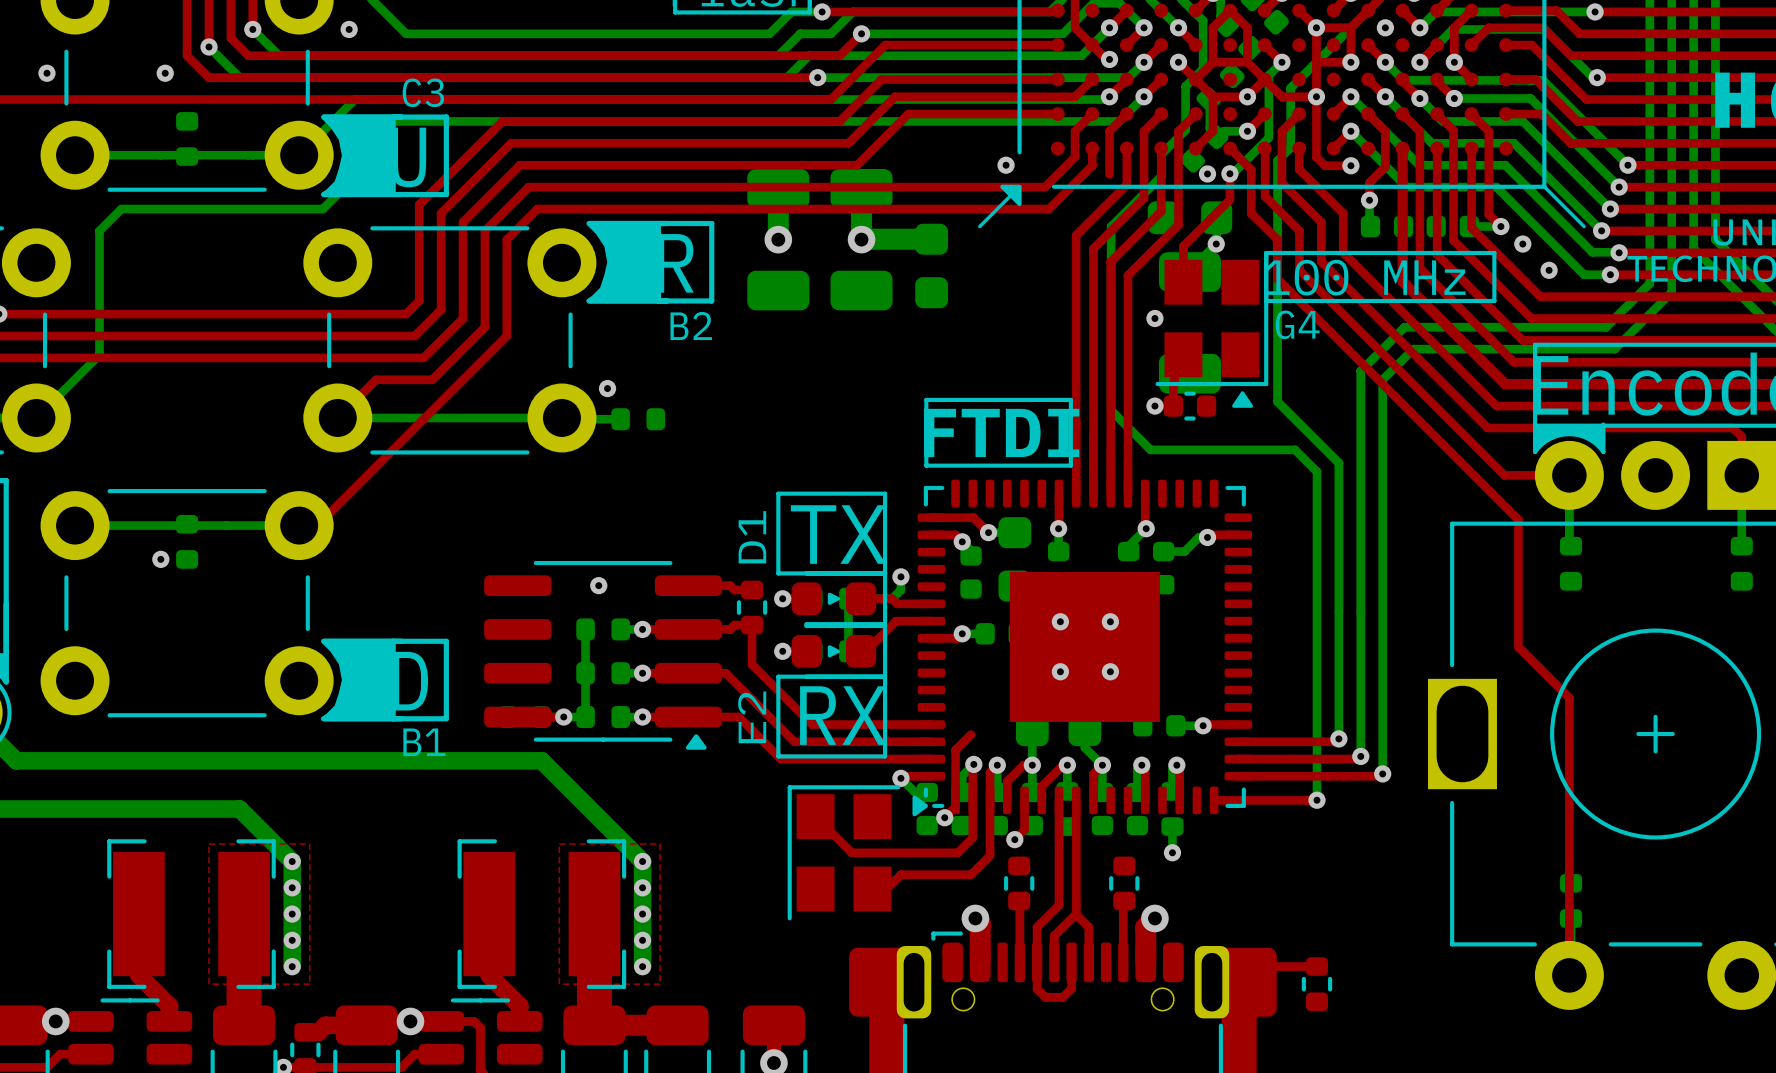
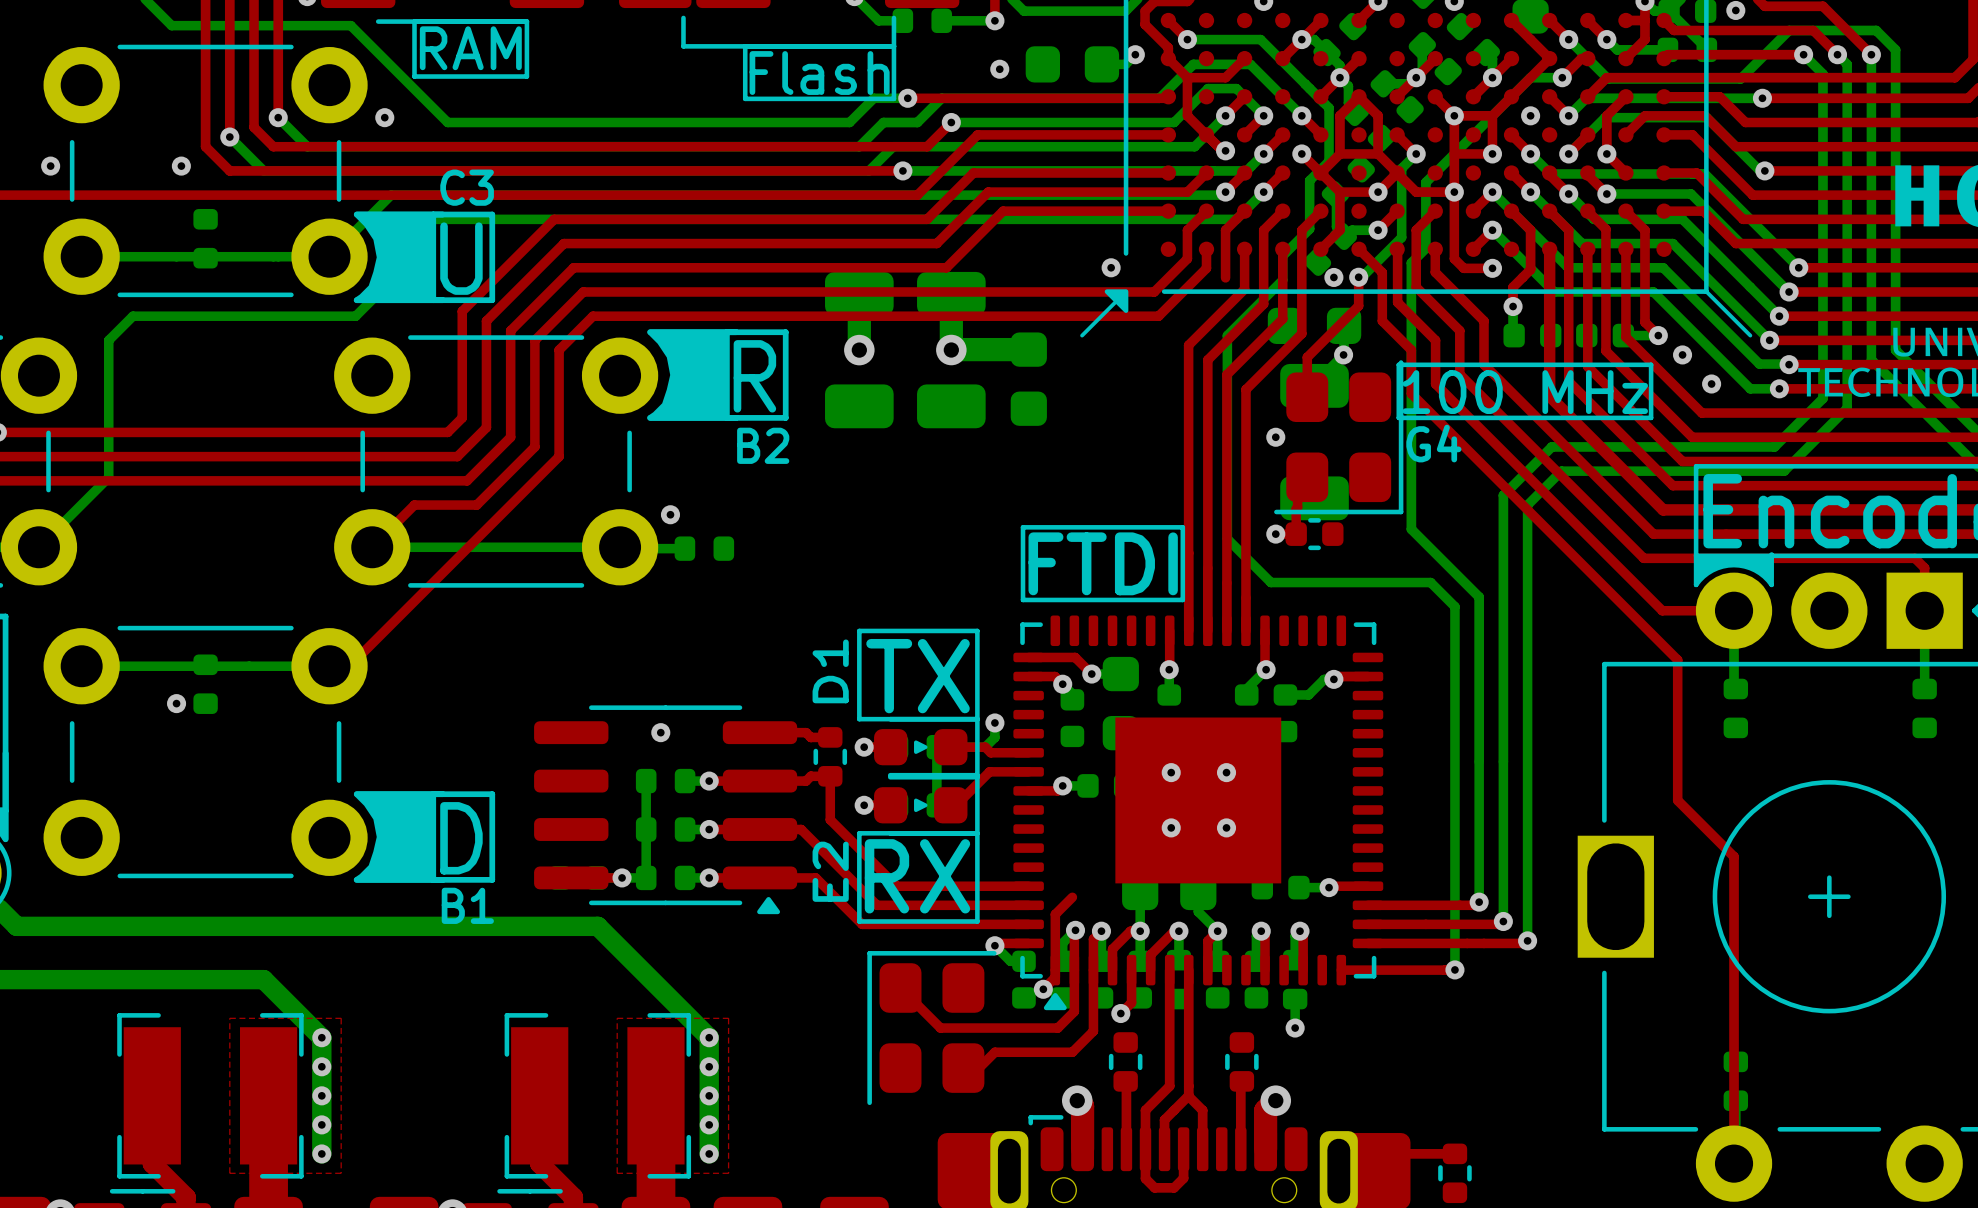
part footprint: [1155, 250, 1269, 408] -> [1274, 360, 1404, 515]
part footprint: [912, 479, 1253, 817] -> [1013, 615, 1384, 1011]
part footprint: [787, 785, 901, 921] -> [867, 951, 997, 1106]

